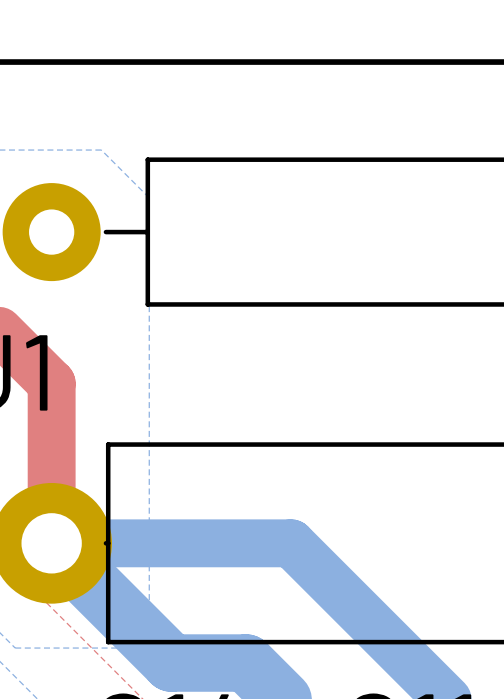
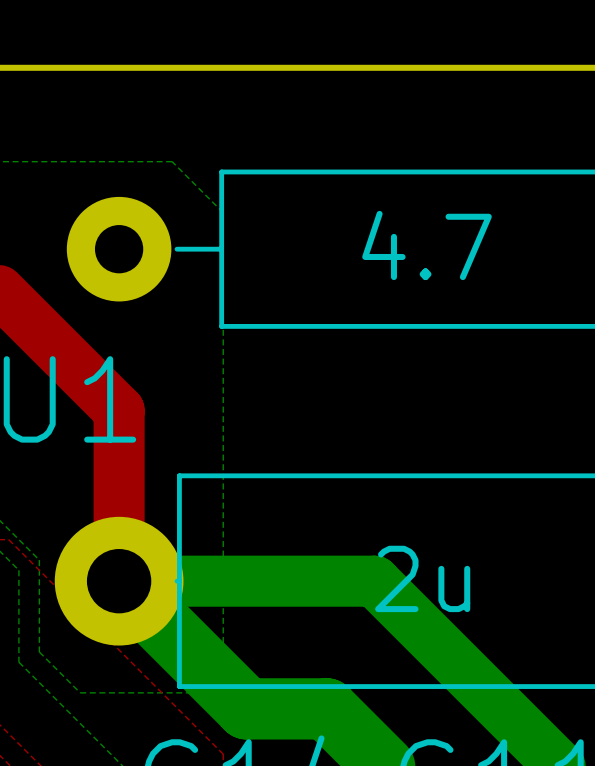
part value: none -> 4.7 (427, 245)
part value: none -> 2u (422, 578)

